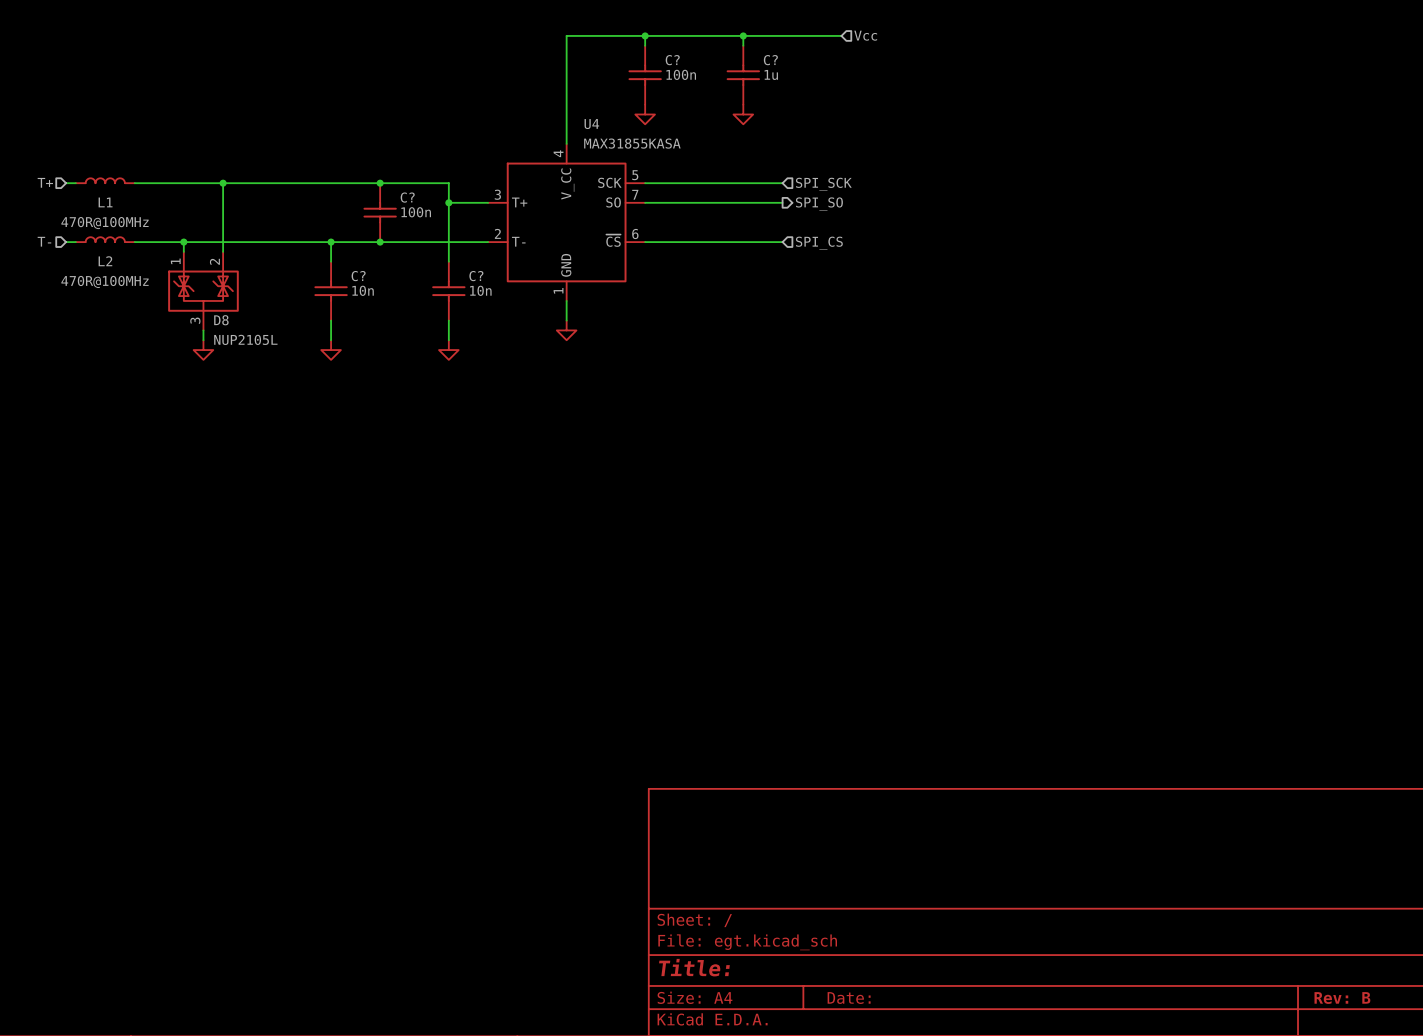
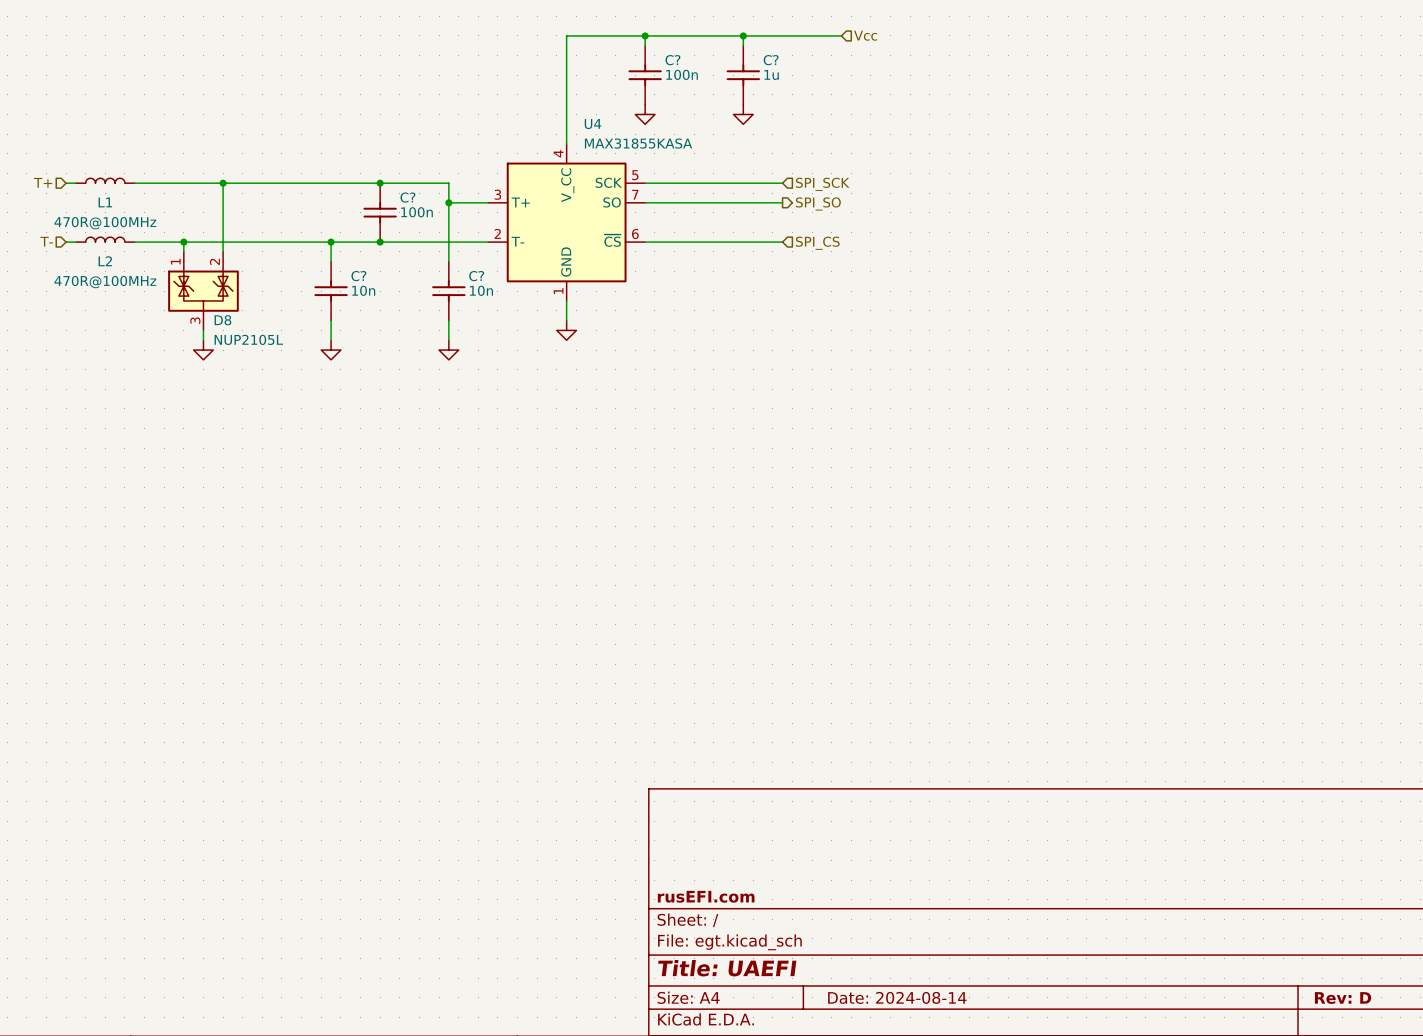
title block: none -> rusEFI.com (706, 896)
title block: Title: (694, 967) -> Title: UAEFI (727, 968)
title block: Date: (849, 998) -> Date: 2024-08-14 (897, 997)
title block: Rev: B (1342, 998) -> Rev: D (1343, 998)

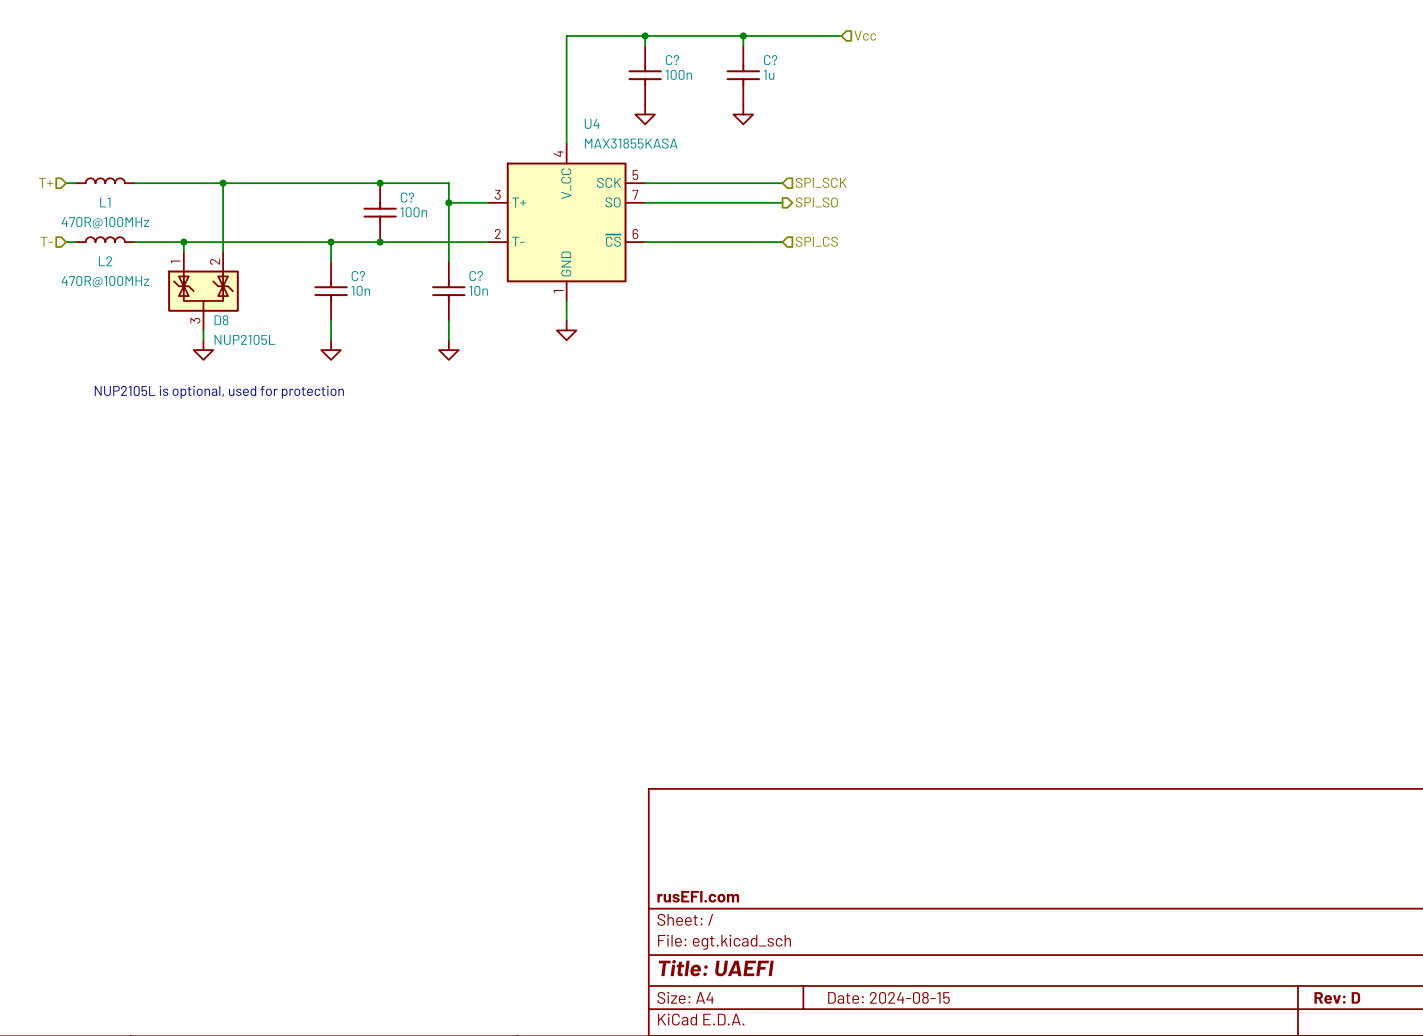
text: none -> NUP2105L is optional, used for protection (219, 392)
title block: Date: 2024-08-14 (897, 997) -> Date: 2024-08-15 (888, 997)

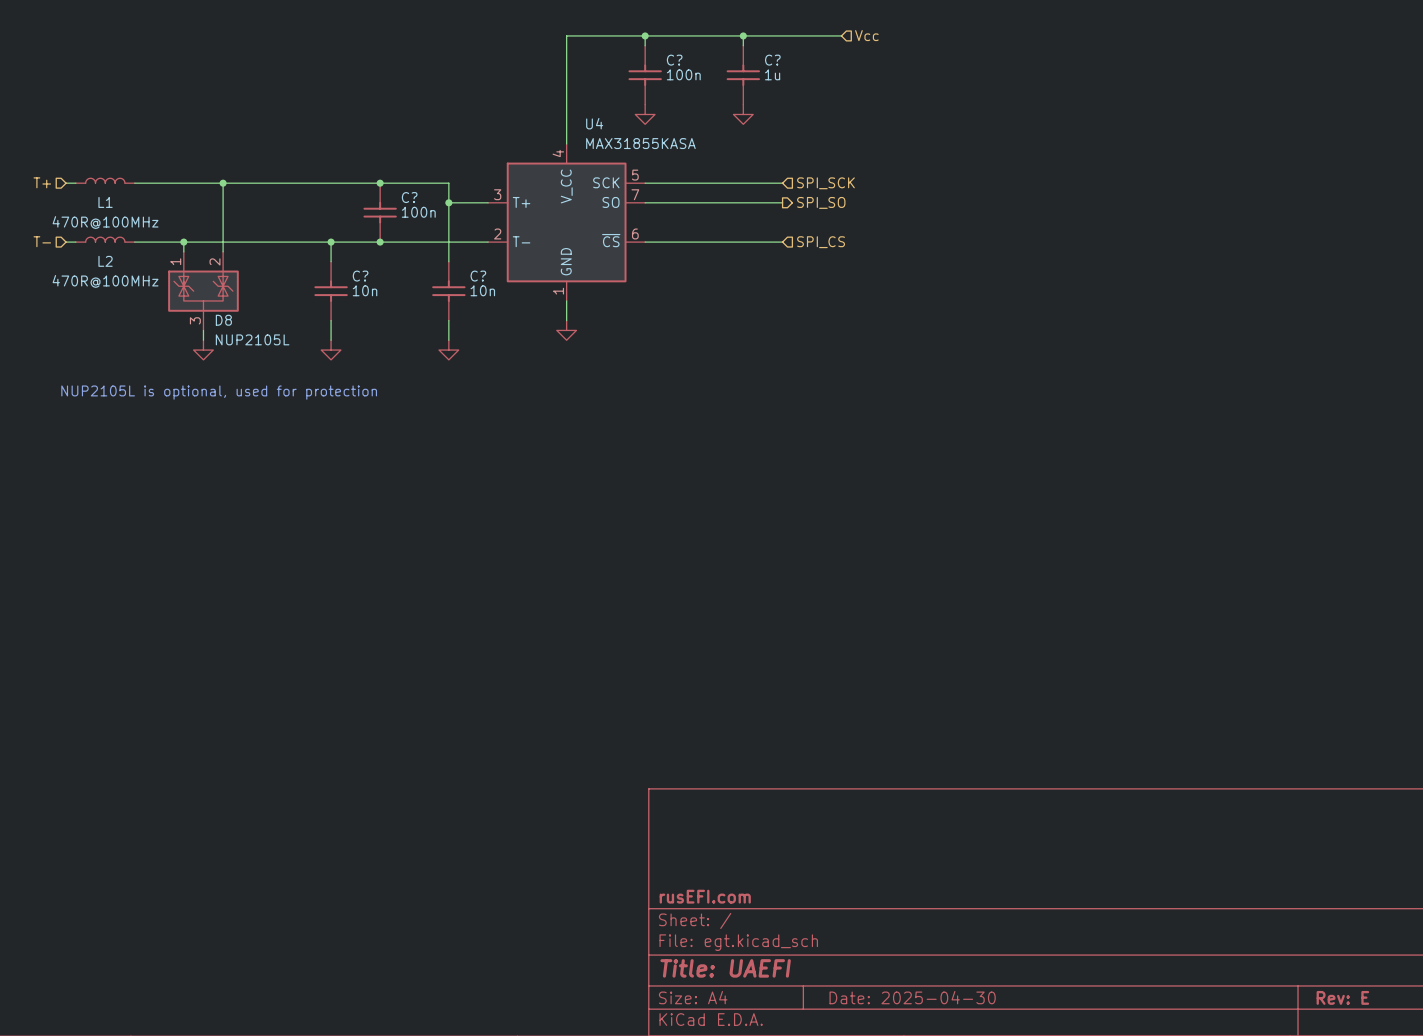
title block: Date: 2024-08-15 (888, 997) -> Date: 2025-04-30 (912, 997)
title block: Rev: D (1337, 997) -> Rev: E (1342, 997)

